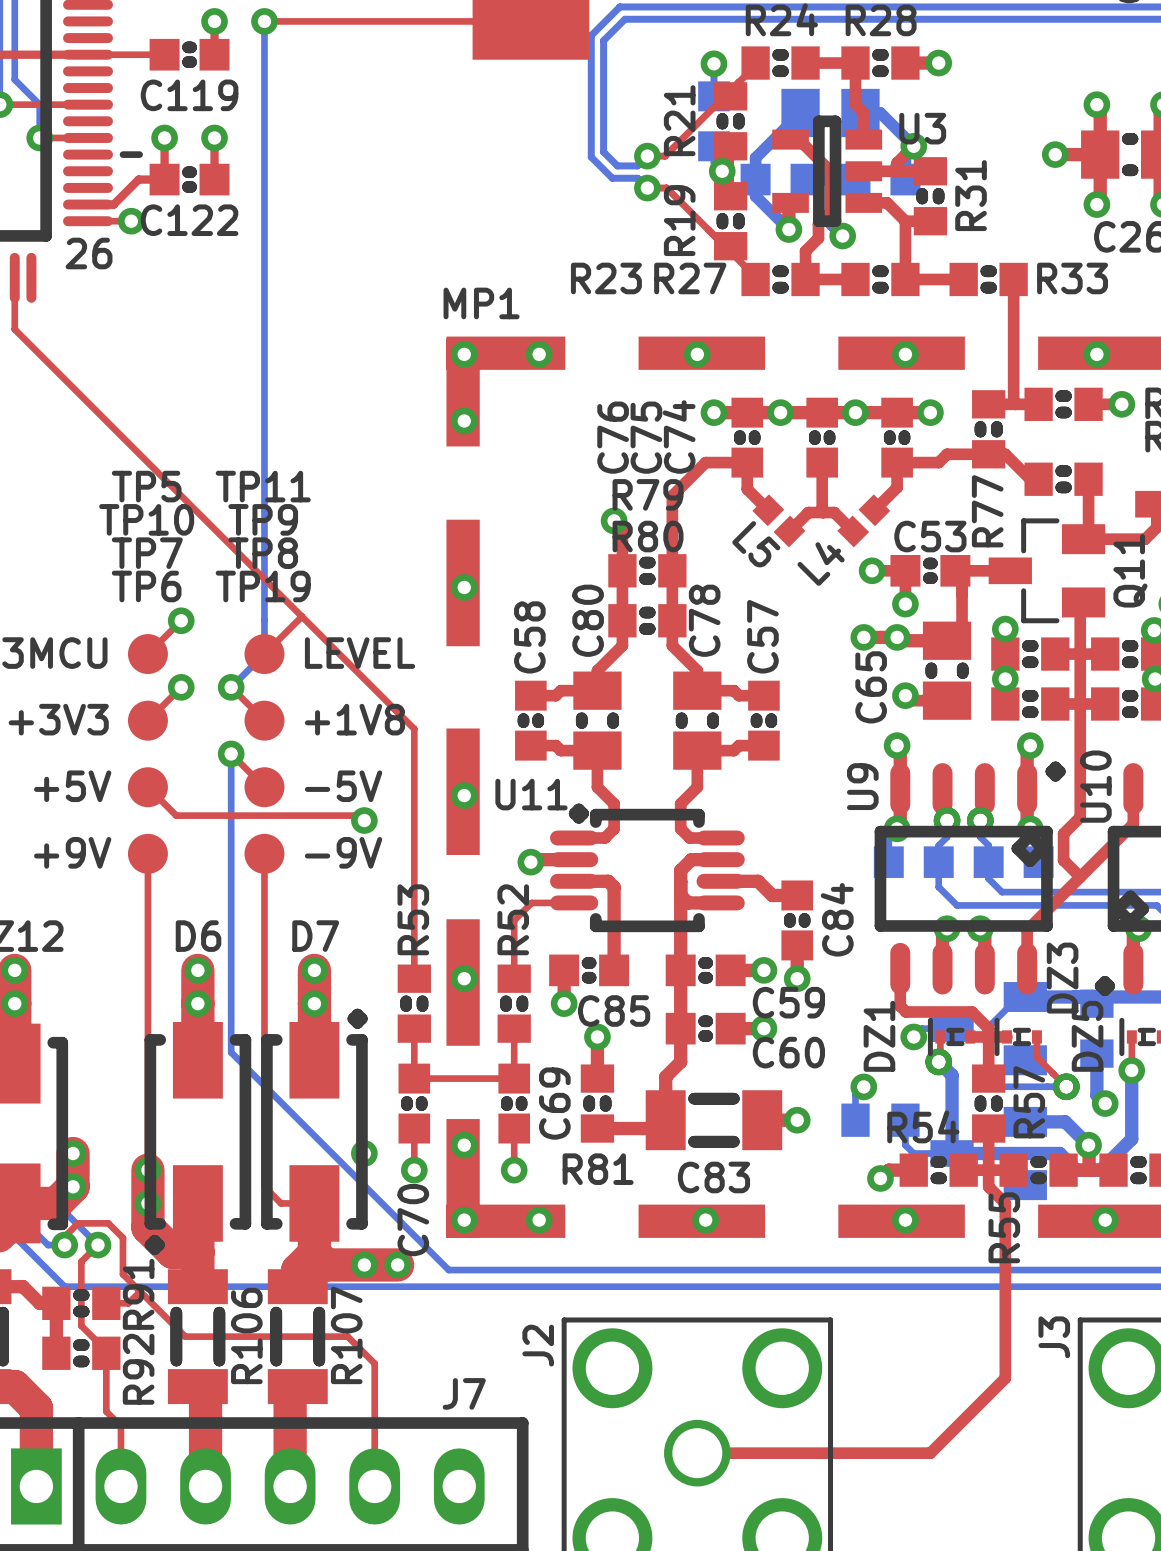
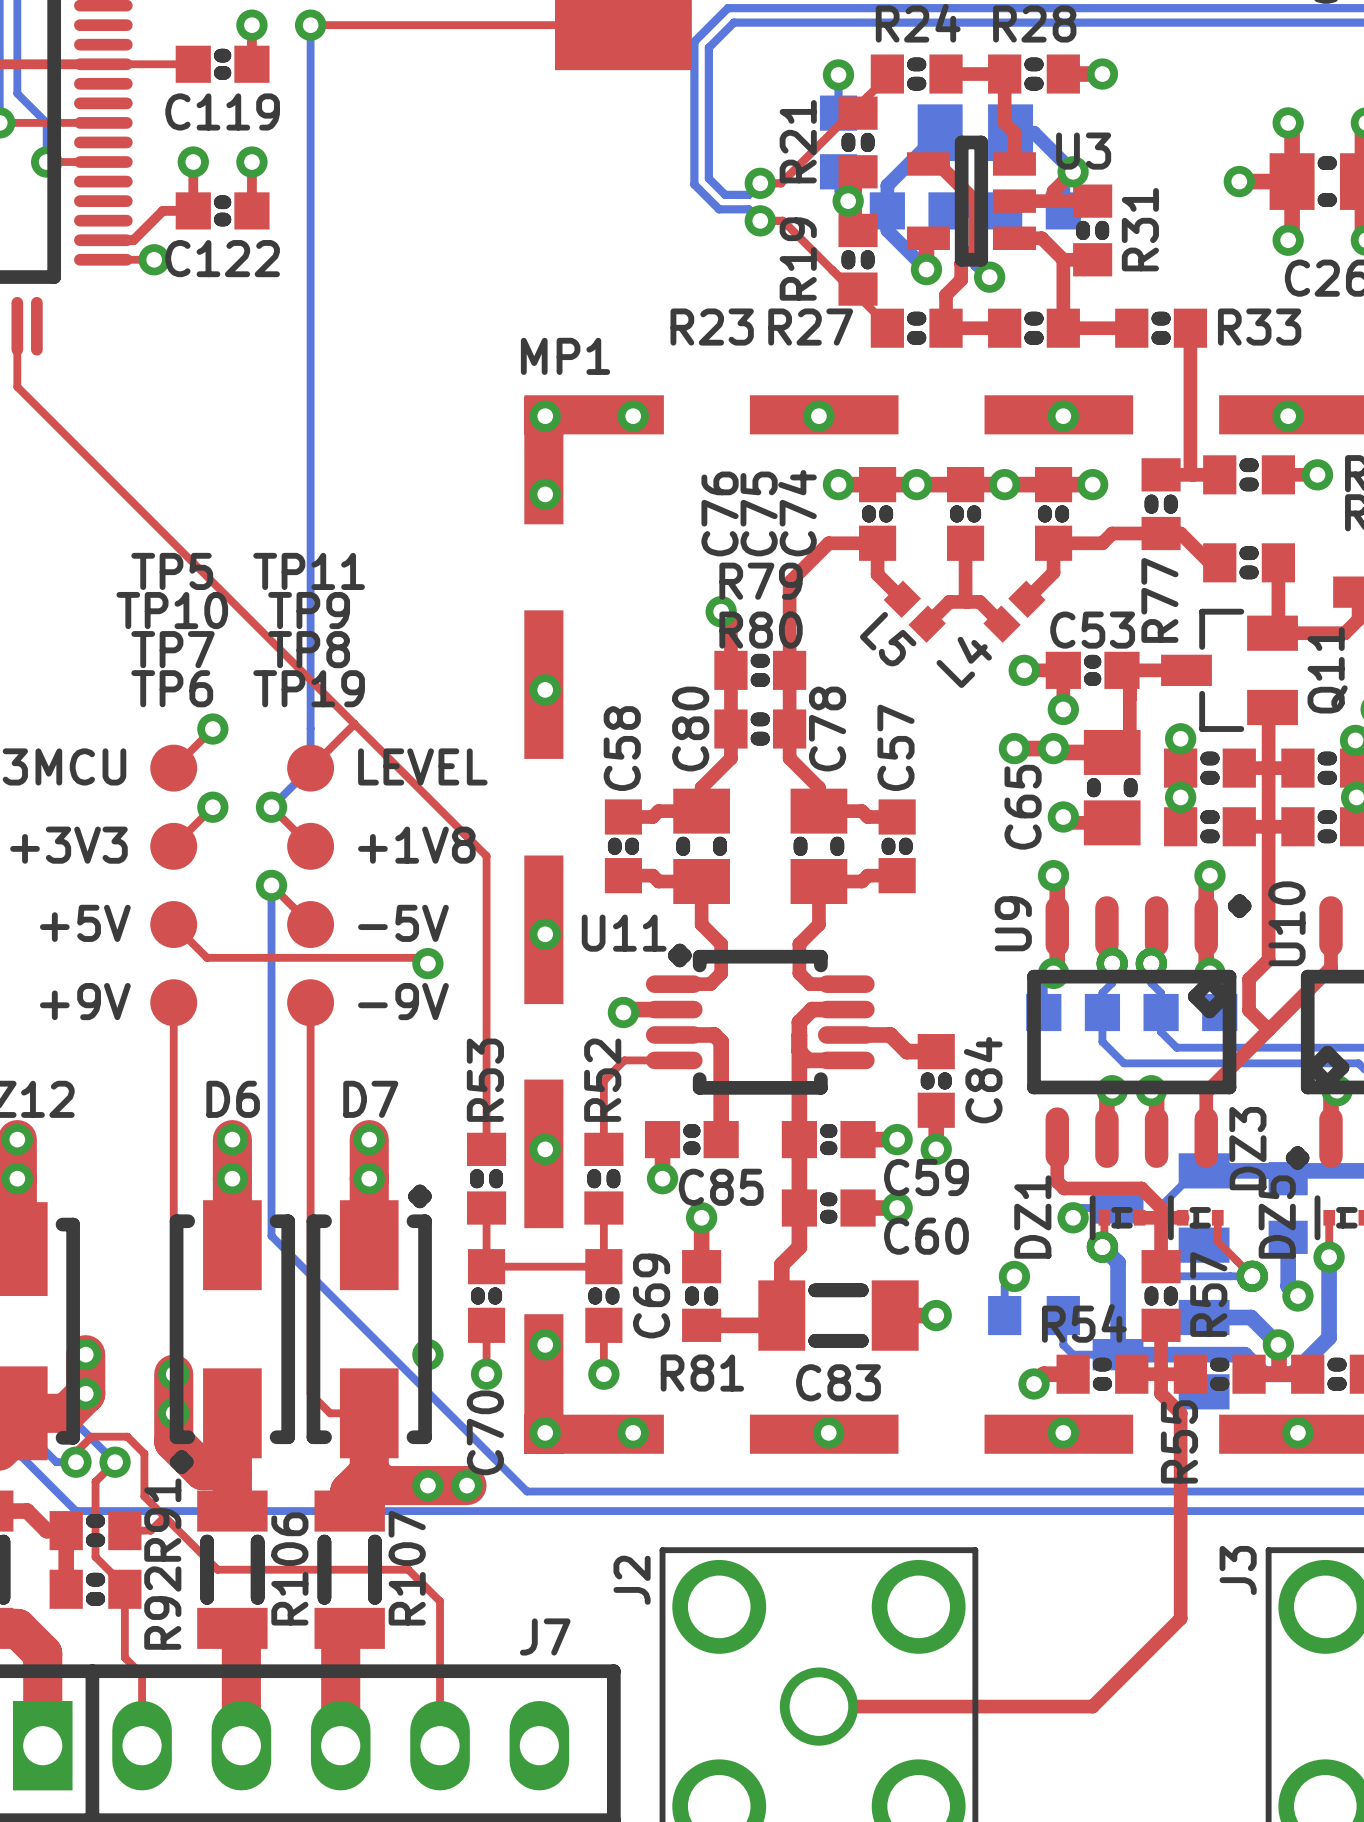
line: (122, 154) (139, 154) -> none
text: 26 (89, 253) -> none

